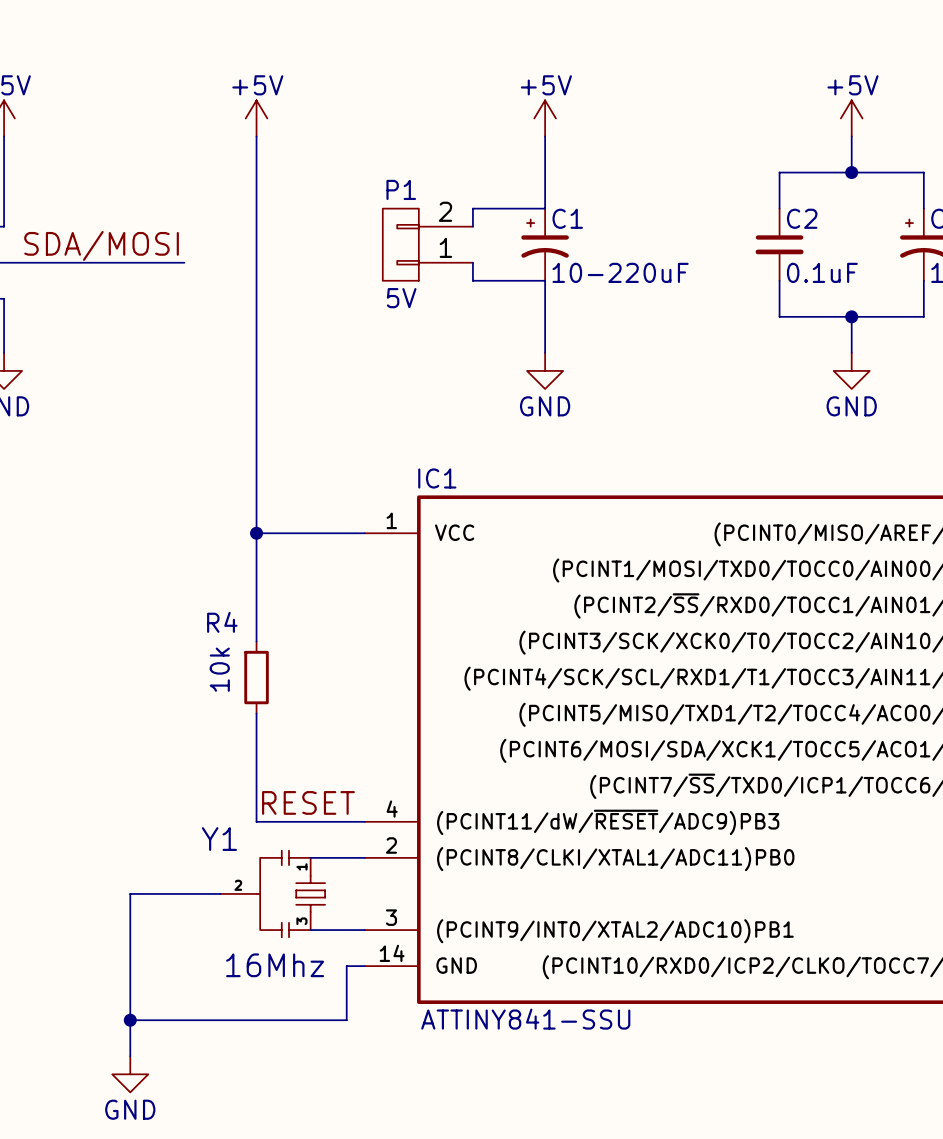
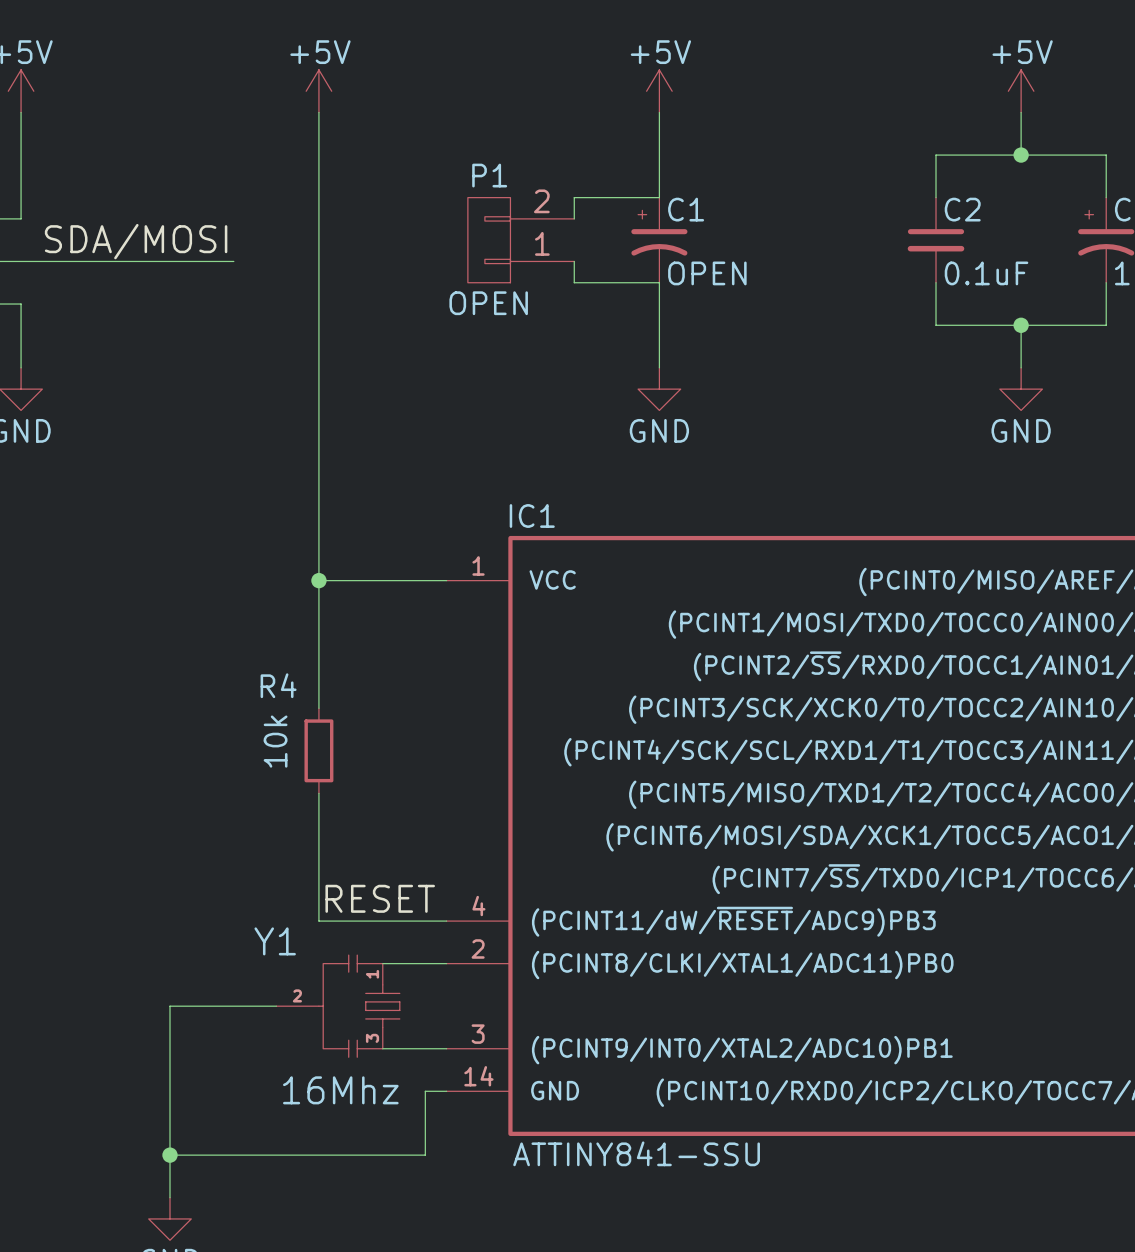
C1 value: 10-220uF (620, 272) -> OPEN (707, 273)
P1 value: 5V (401, 298) -> OPEN (488, 303)

